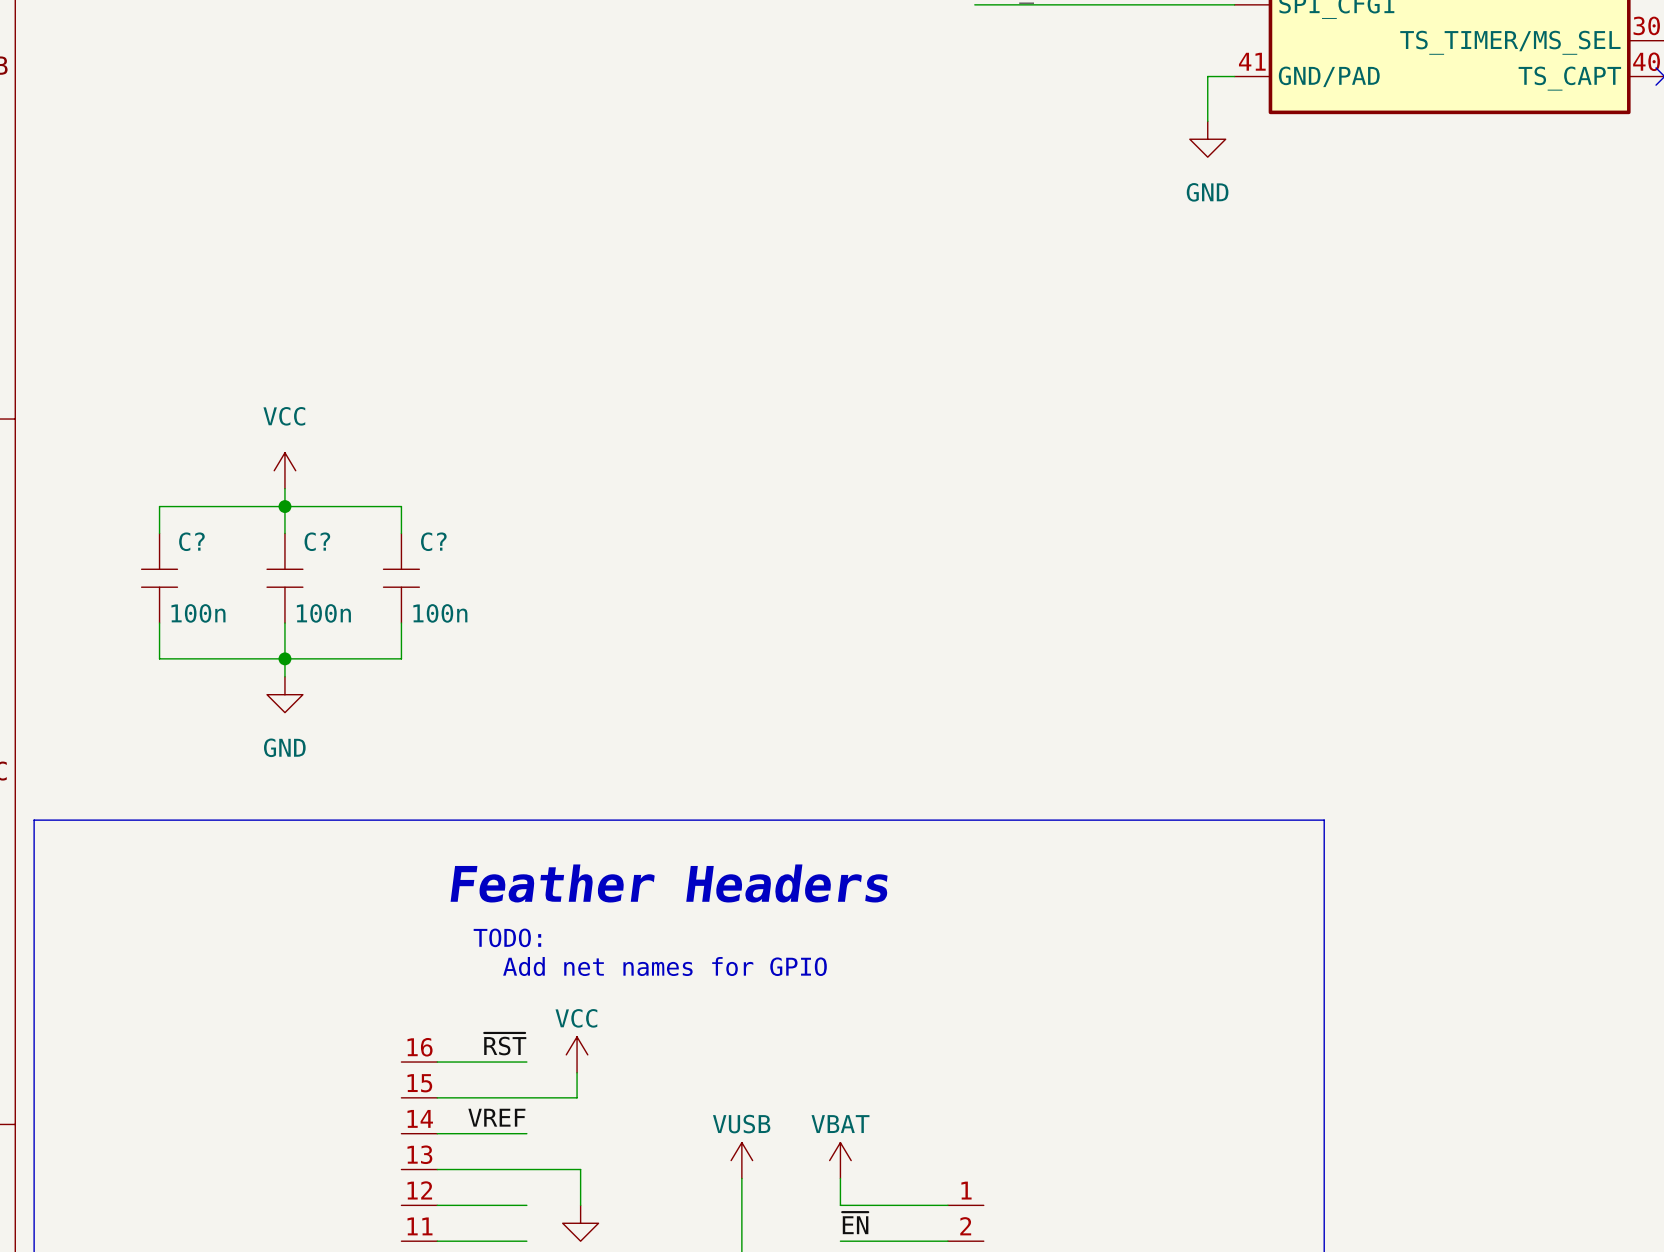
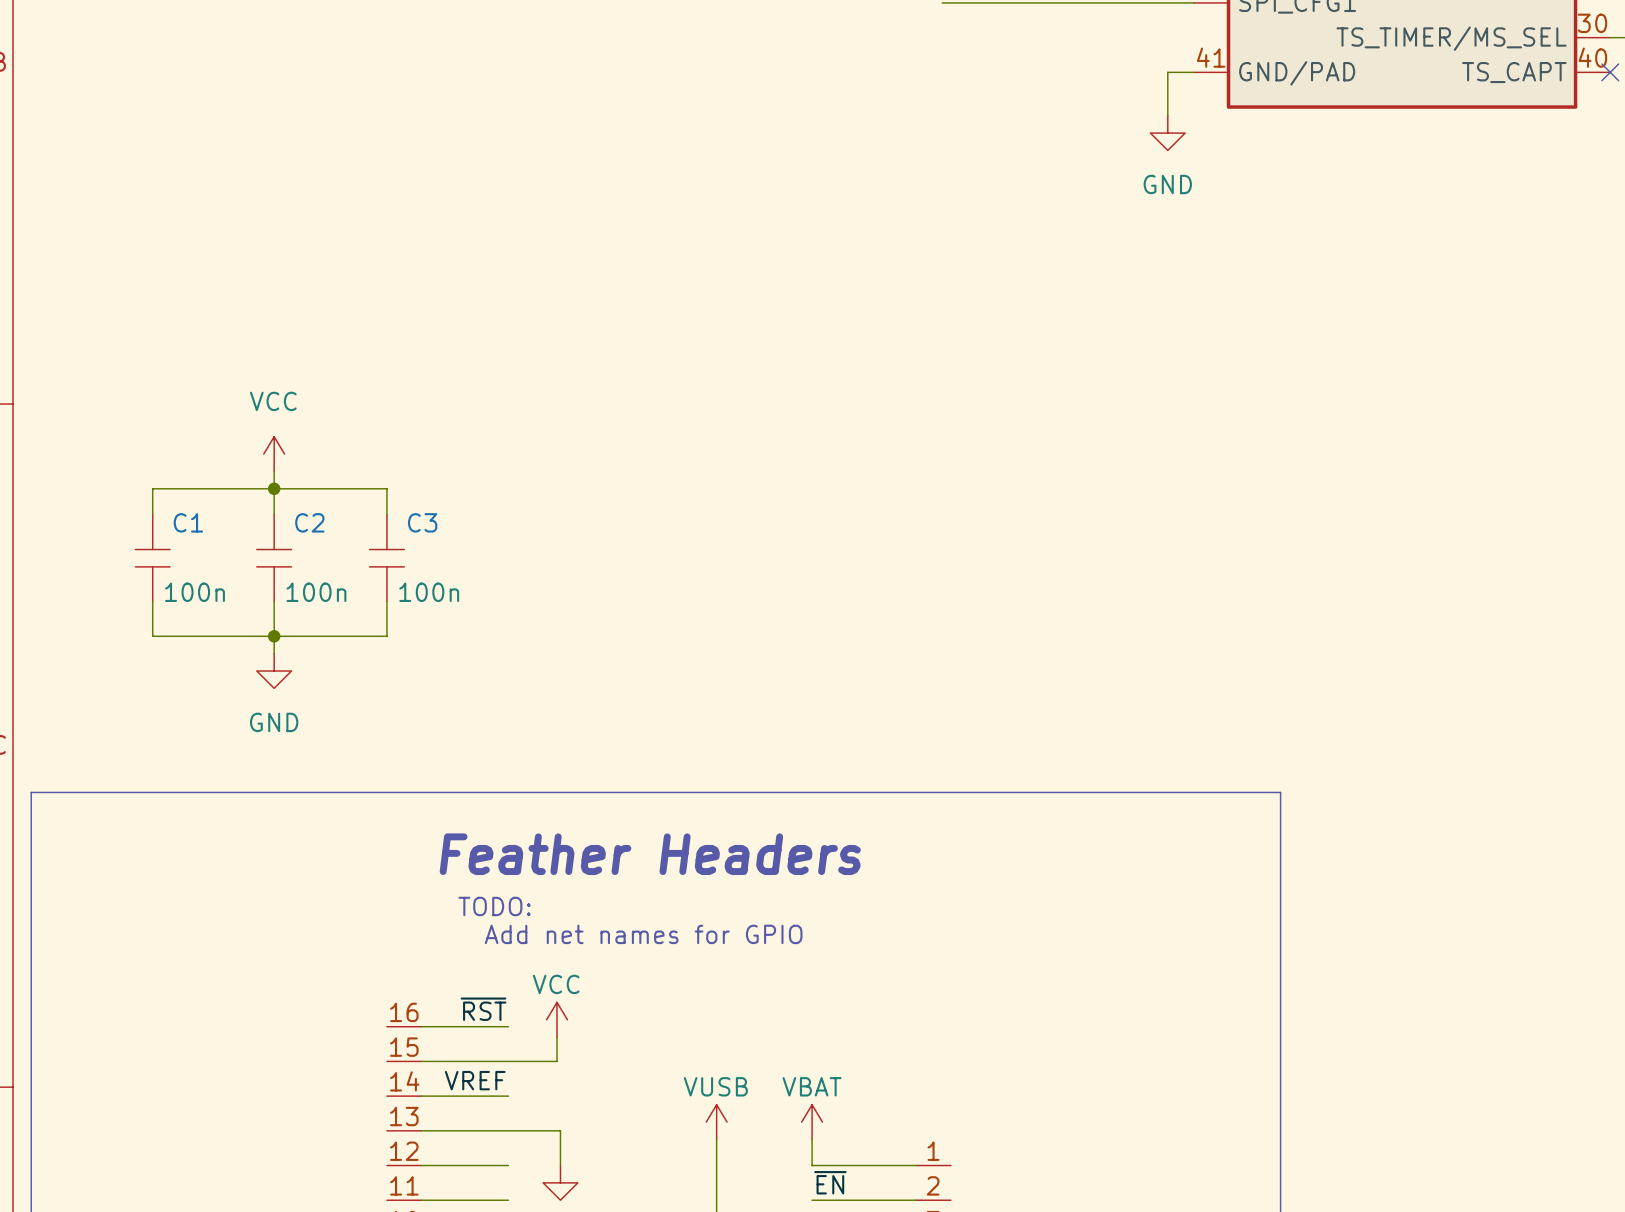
C? name: C? (191, 541) -> C1 (188, 522)
C? name: C? (317, 541) -> C2 (309, 522)
C? name: C? (433, 541) -> C3 (422, 522)

